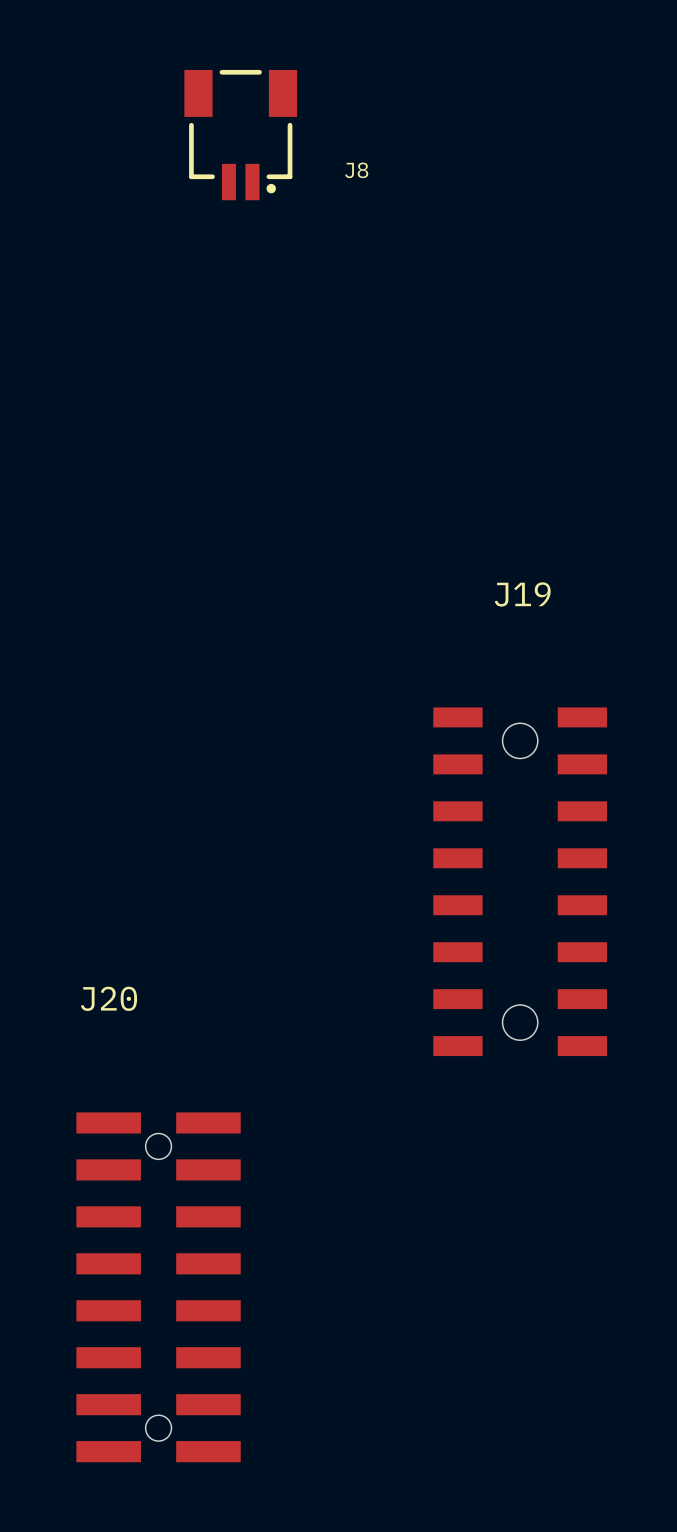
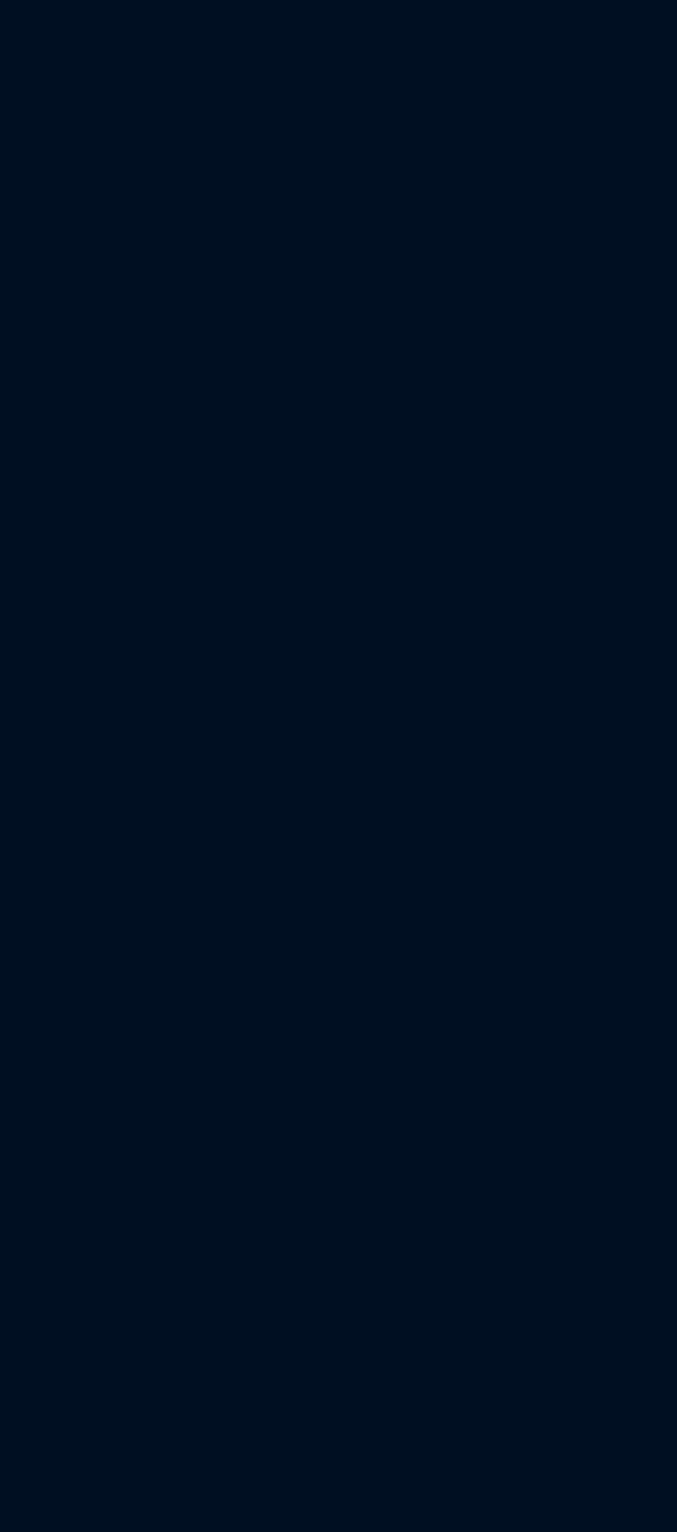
J8: (240, 135) -> none
J19: (520, 881) -> none
J20: (158, 1287) -> none

